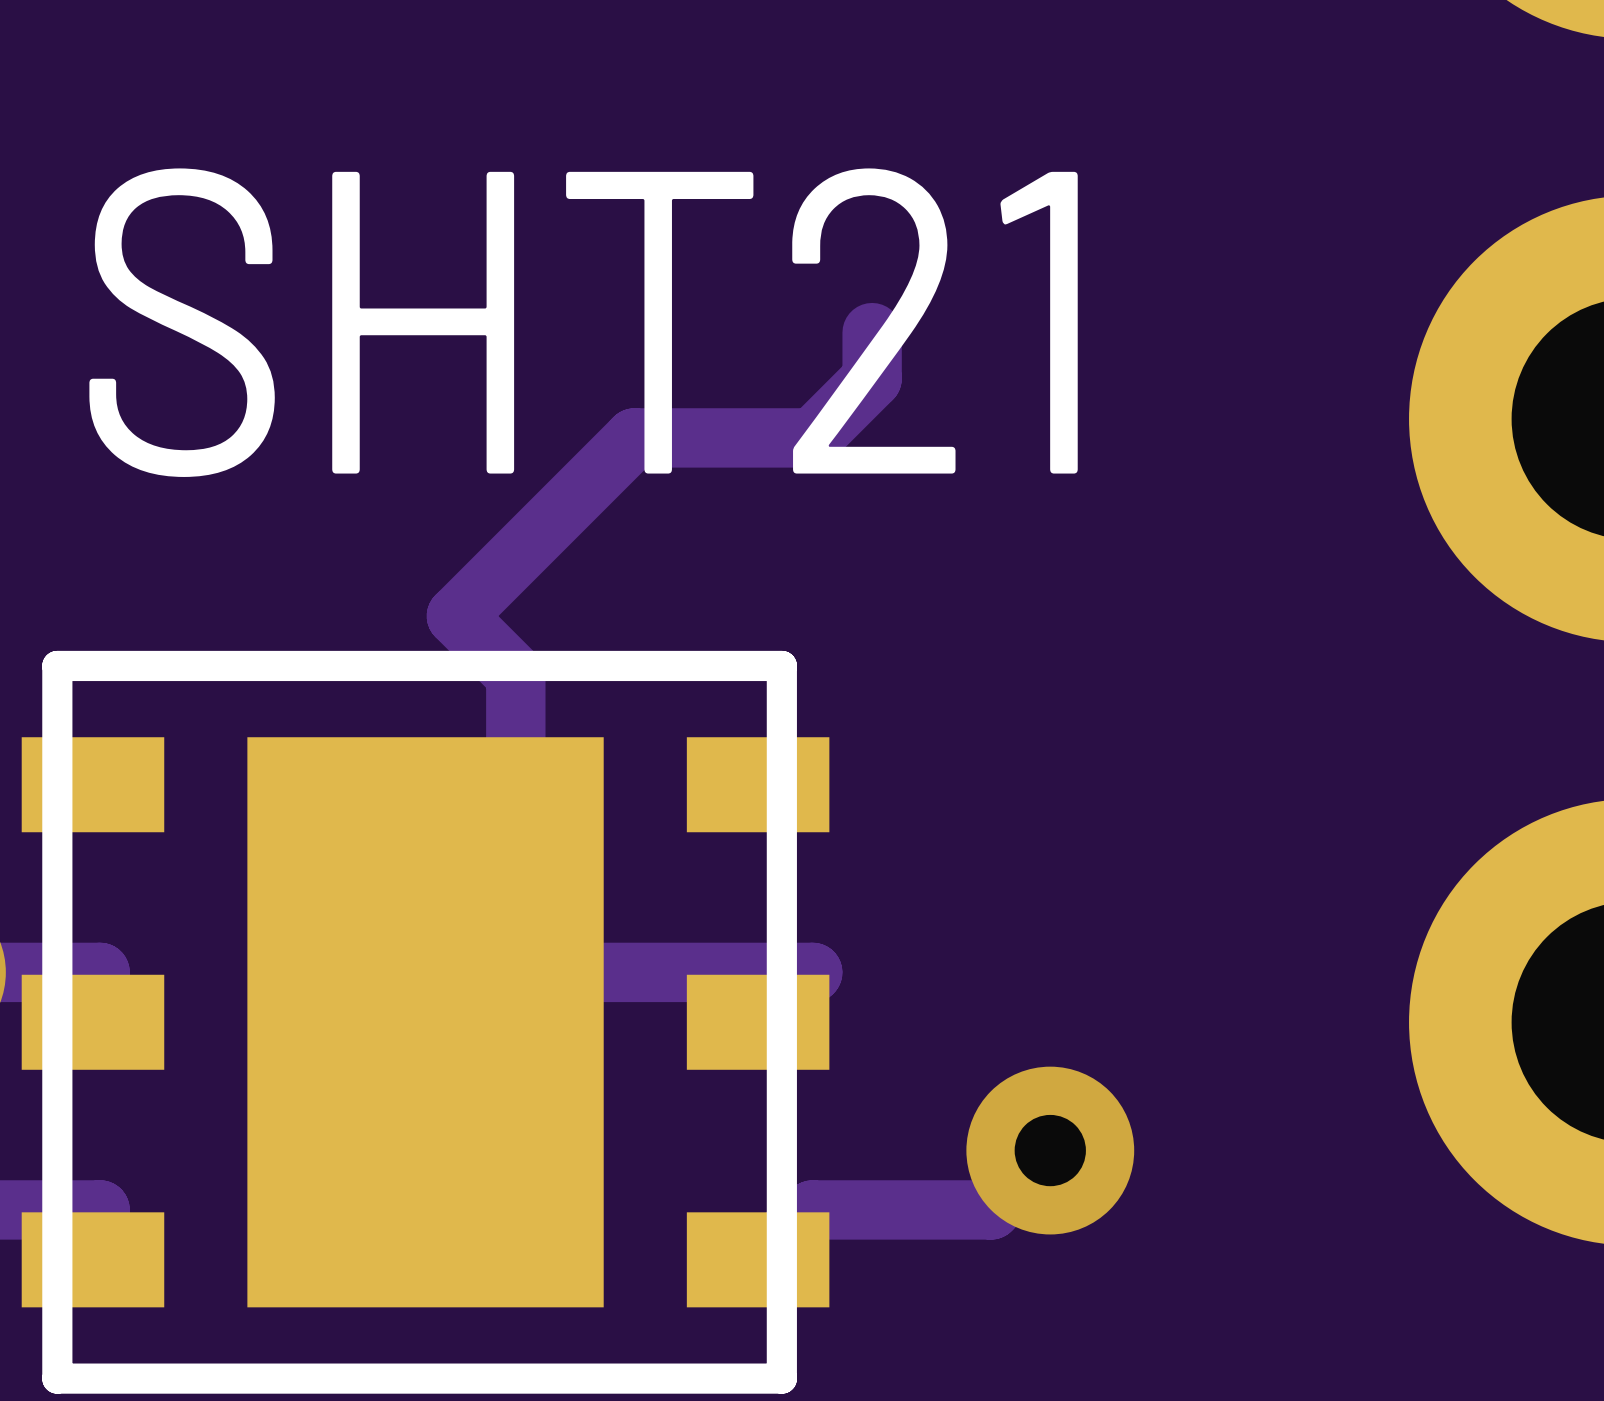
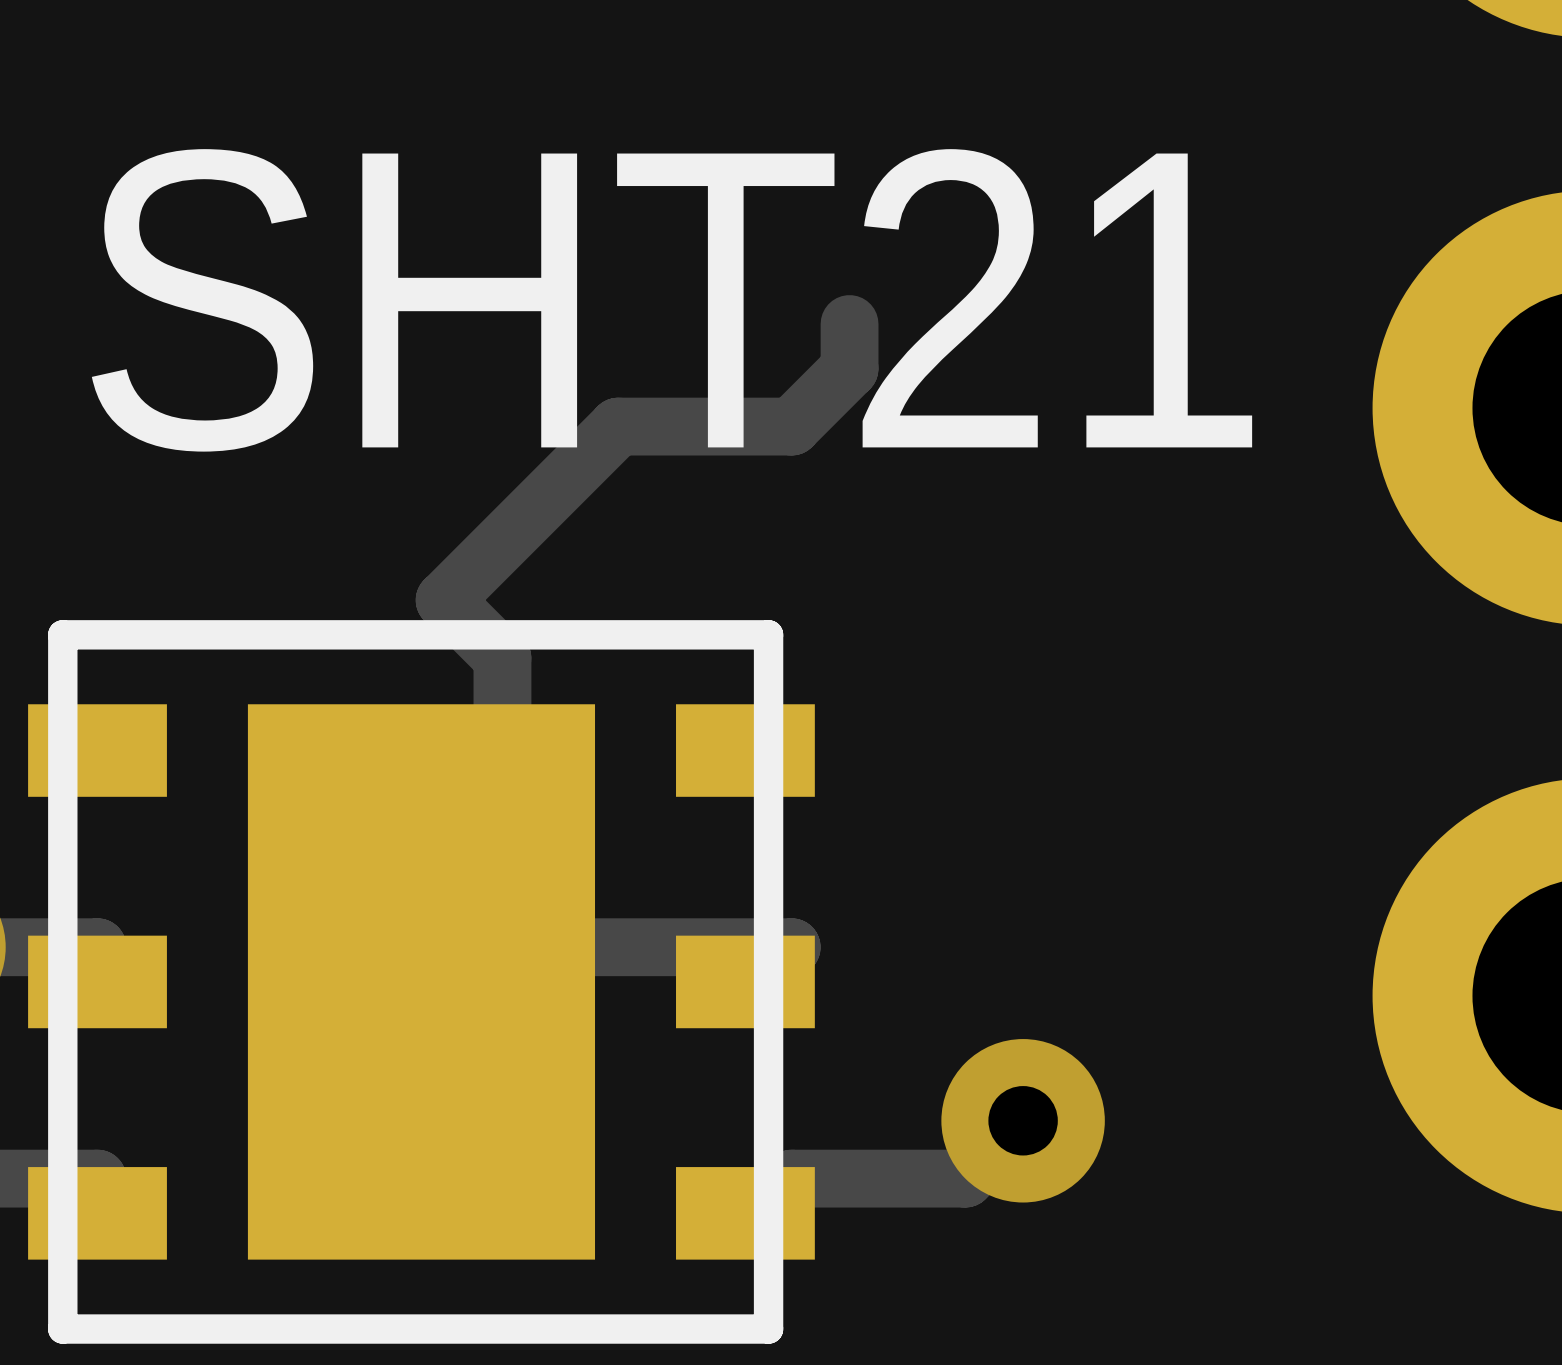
part position: (425, 1022) -> (421, 981)

